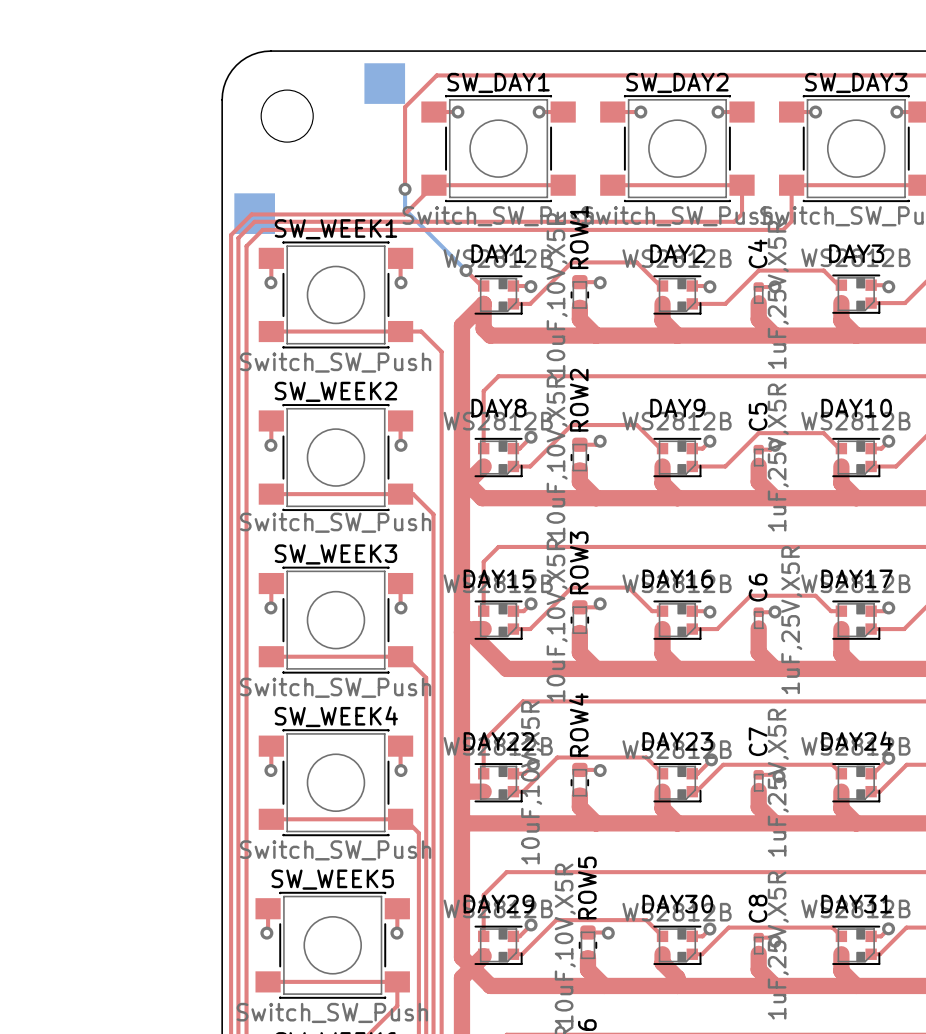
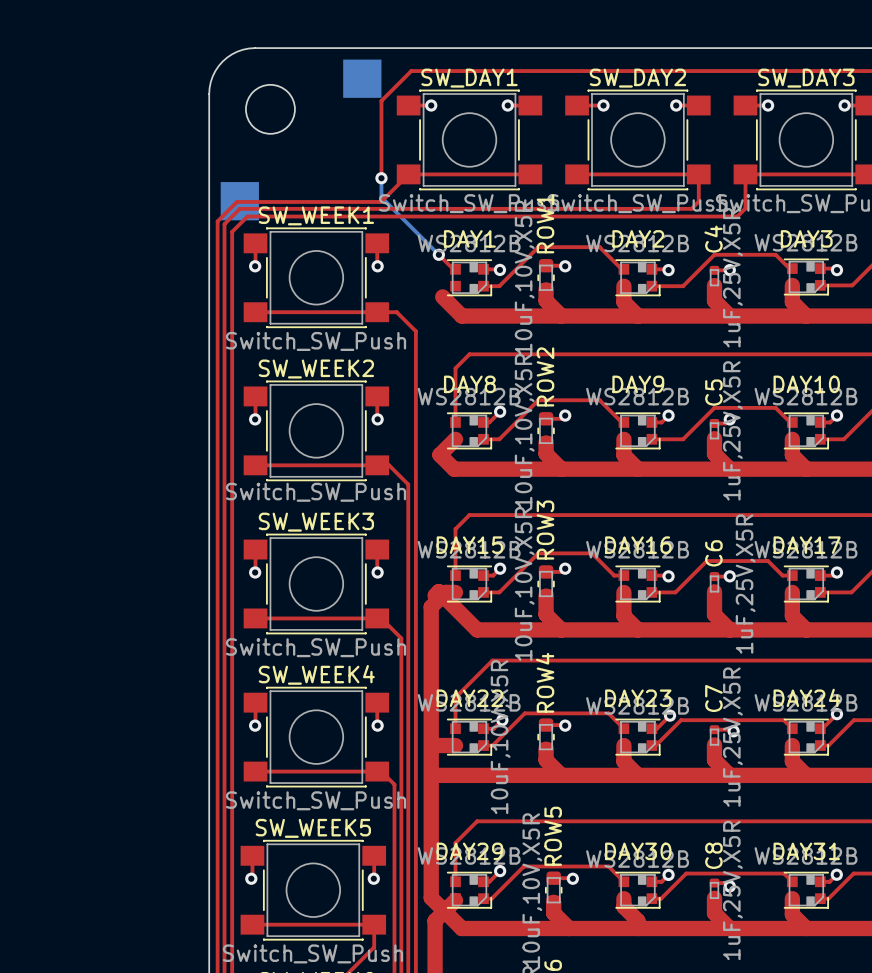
top track: none -> (442, 296) (455, 309)
top track: (483, 328) (483, 303) (461, 325) (461, 957) -> (445, 592) (431, 606) (431, 897) (435, 901)

